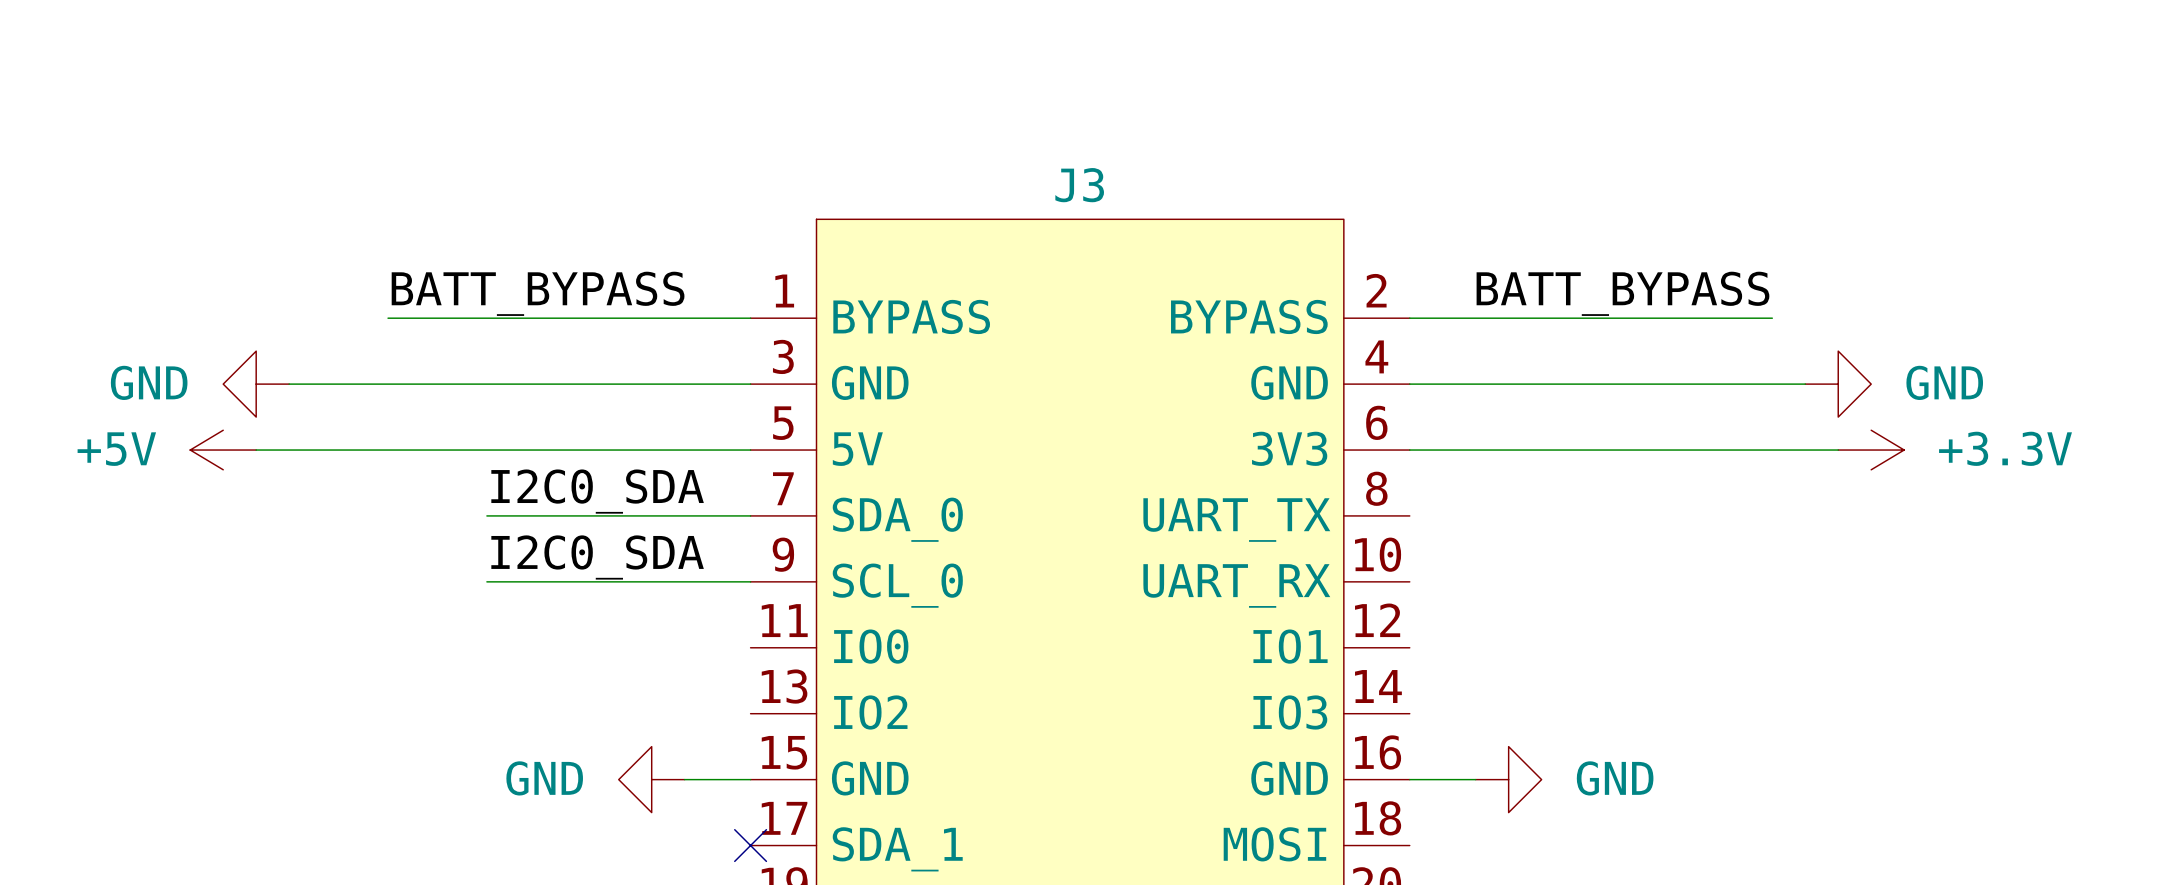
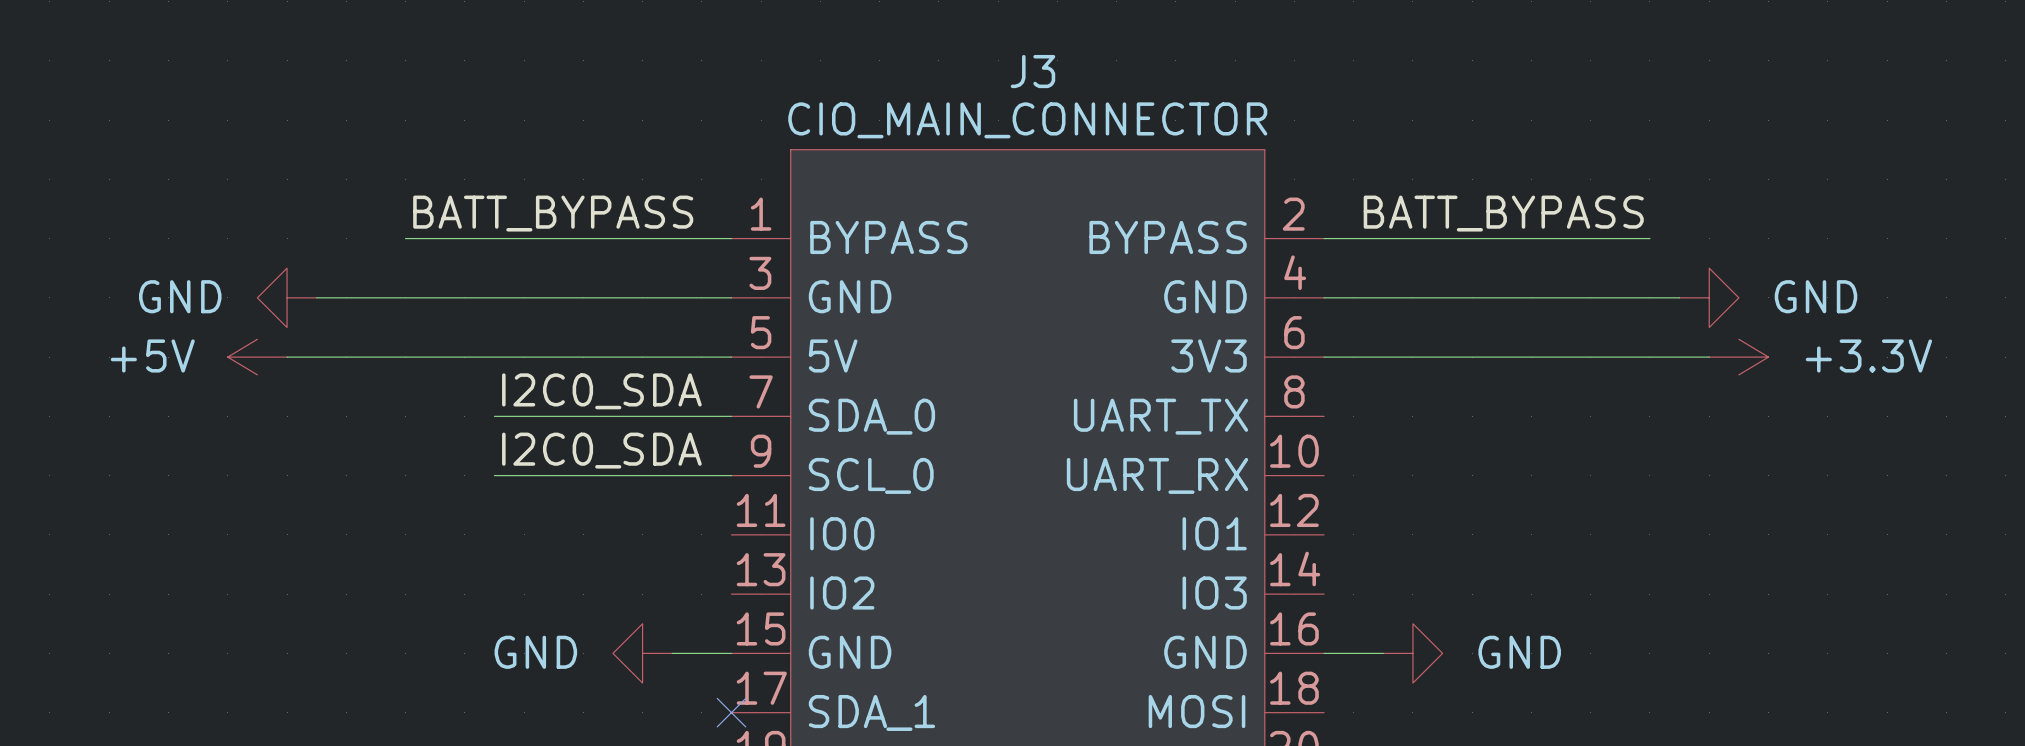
J3 name position: J3 (1079, 185) -> J3 (1032, 71)
J3 value: none -> CIO_MAIN_CONNECTOR (1027, 120)

